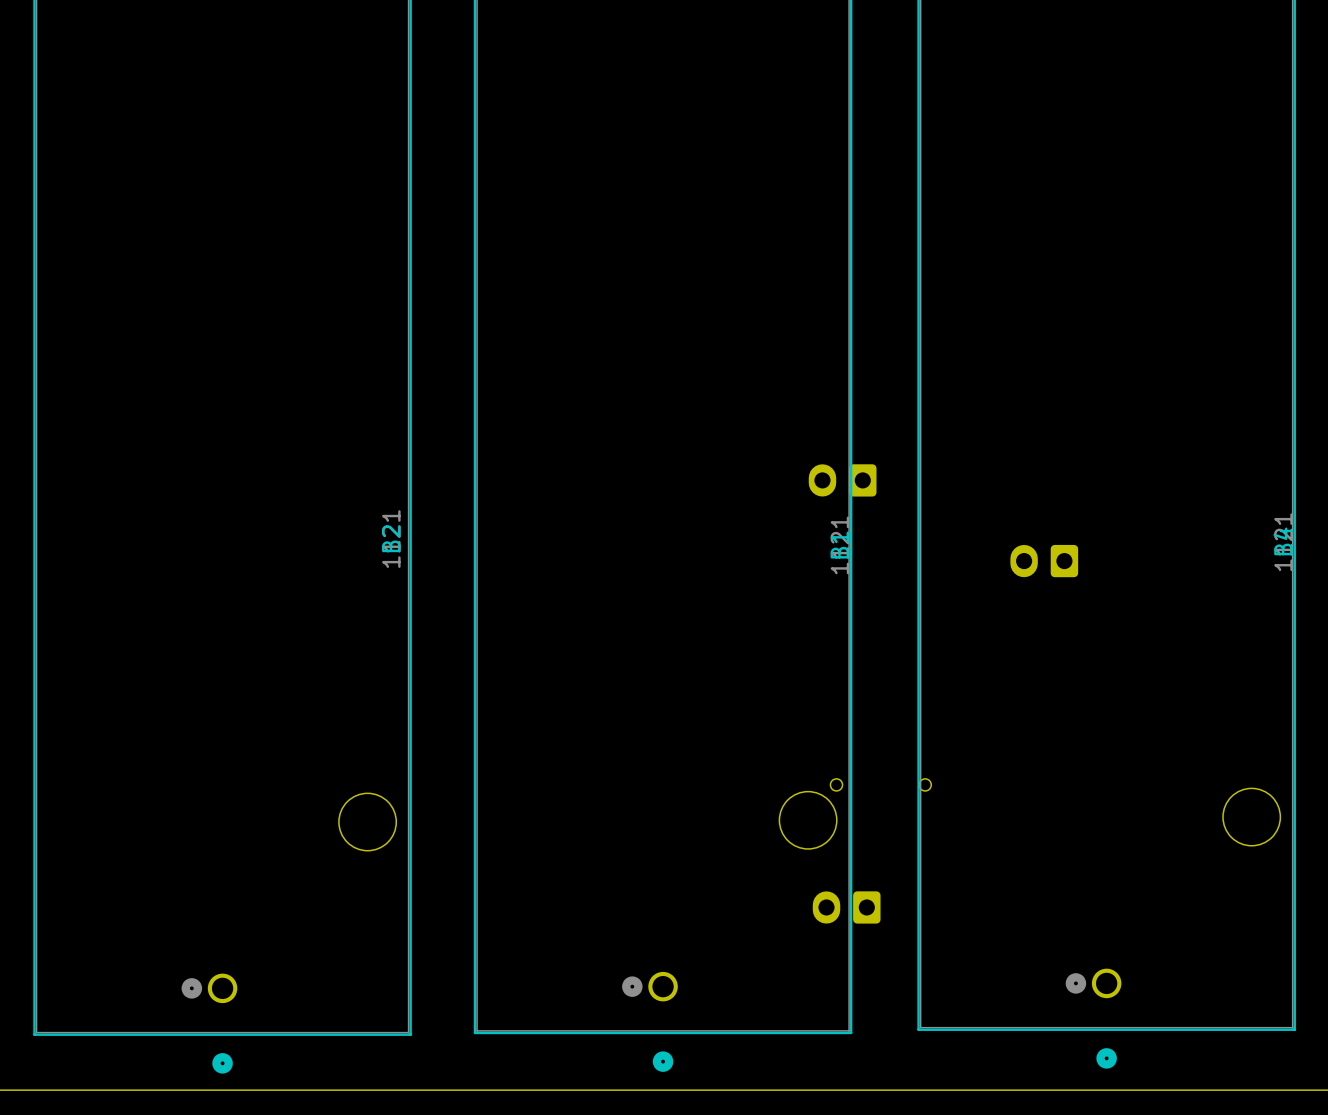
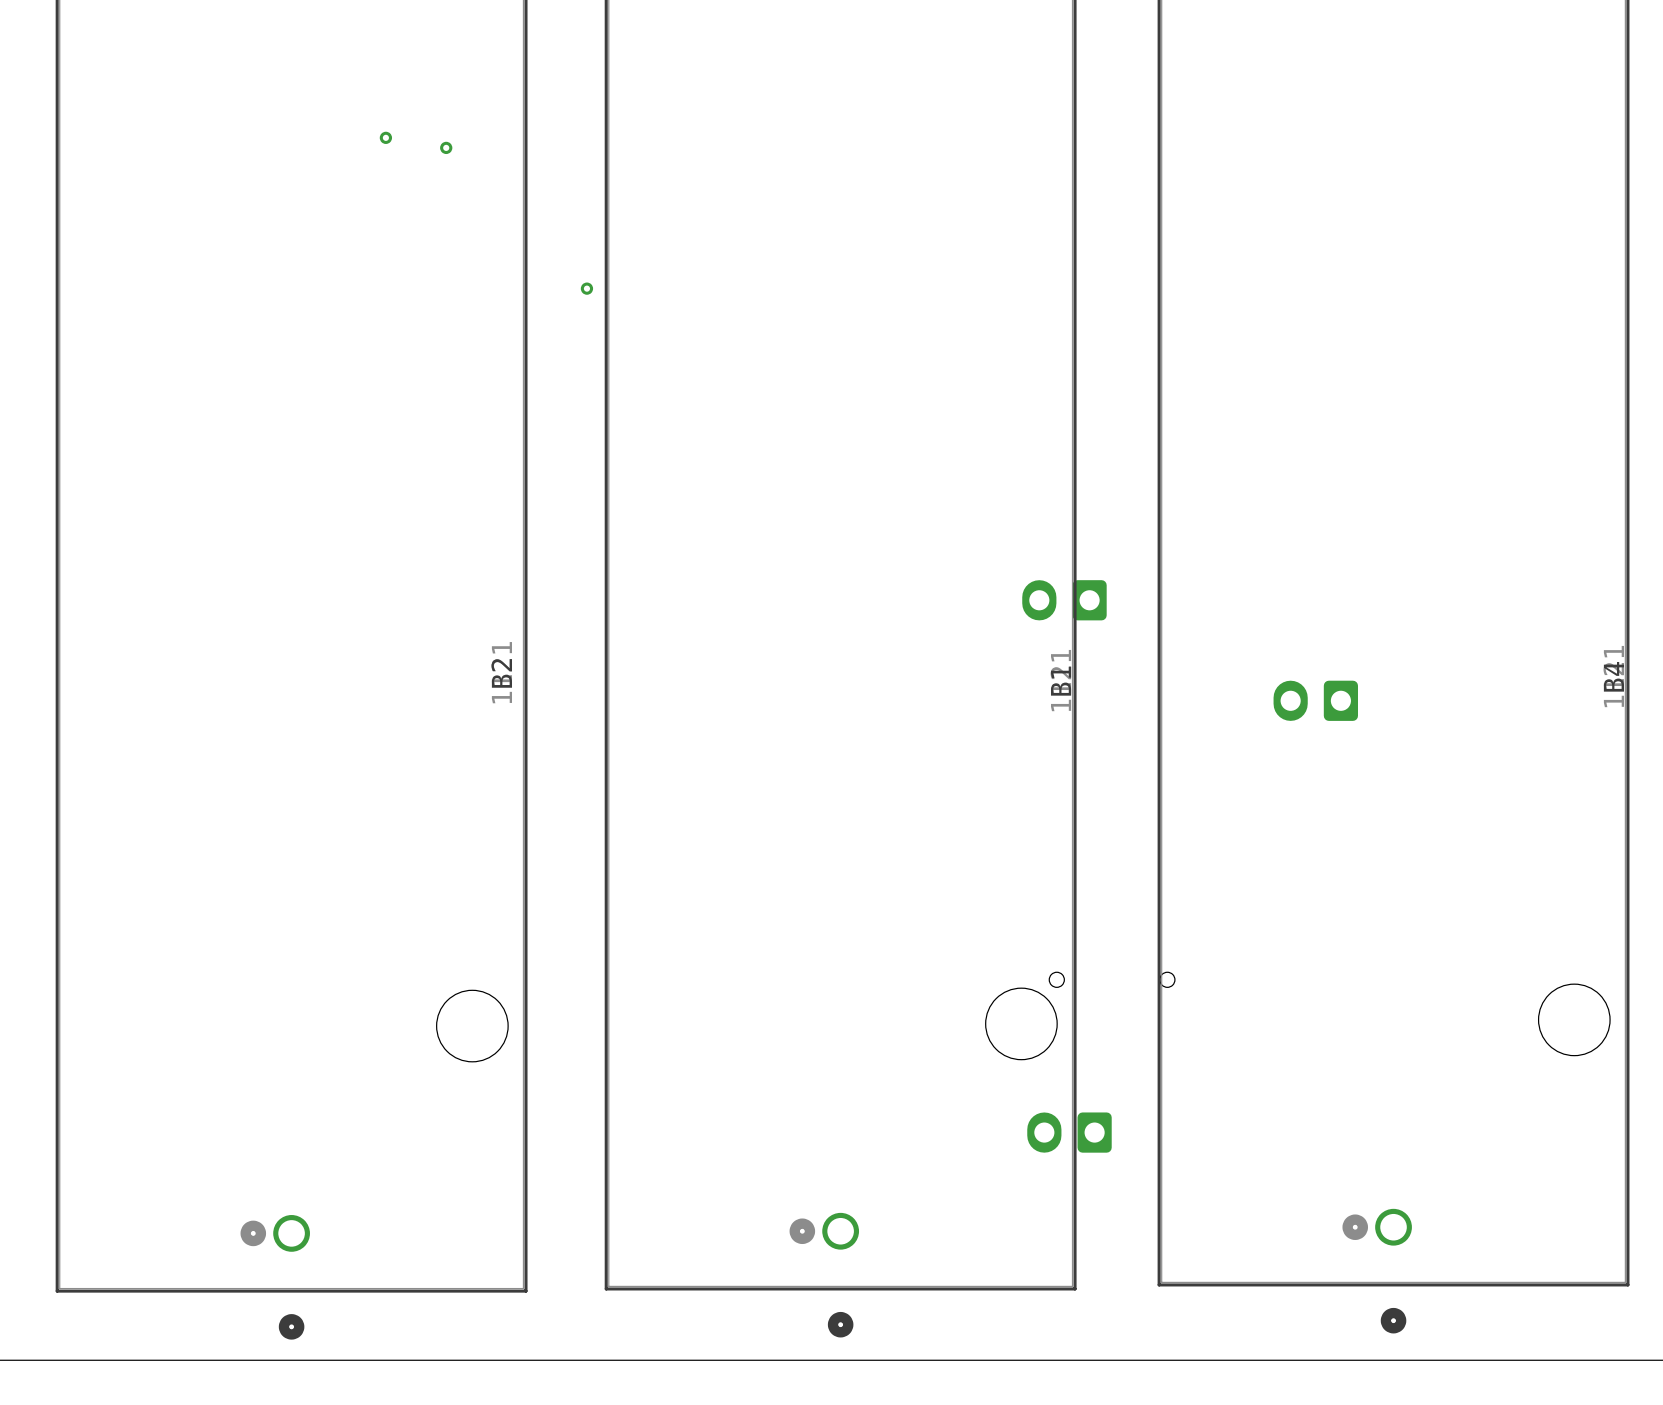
via: none -> (385, 137)
via: none -> (446, 147)
via: none -> (586, 288)

